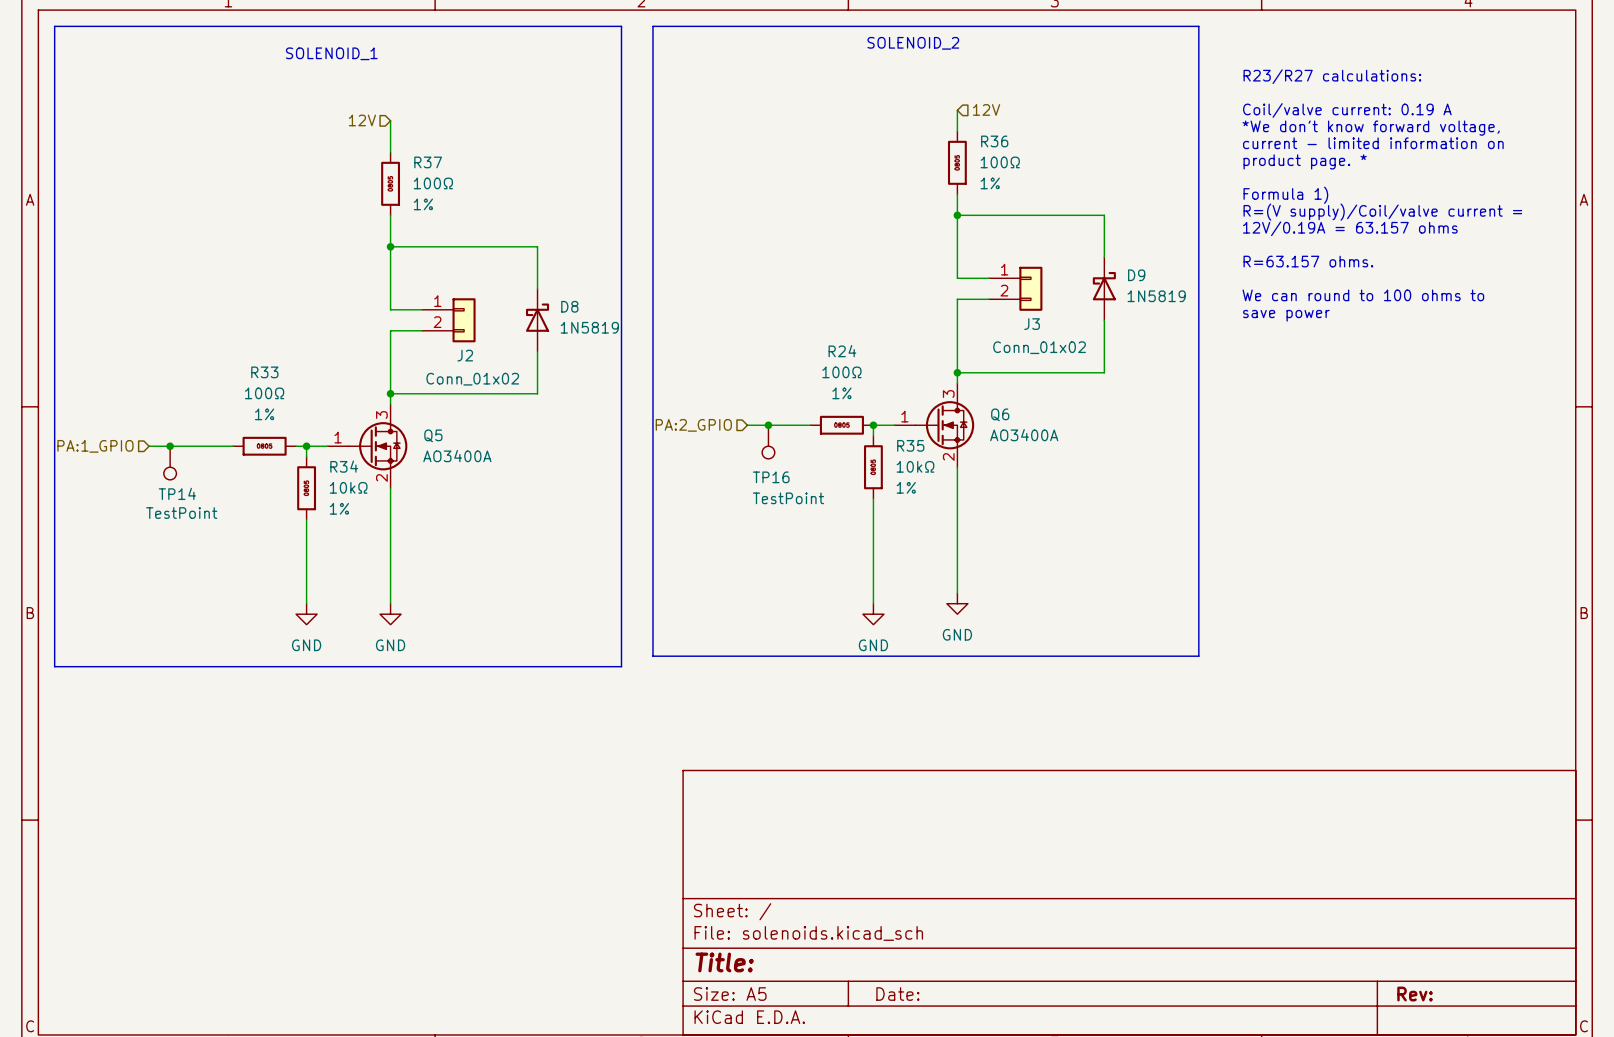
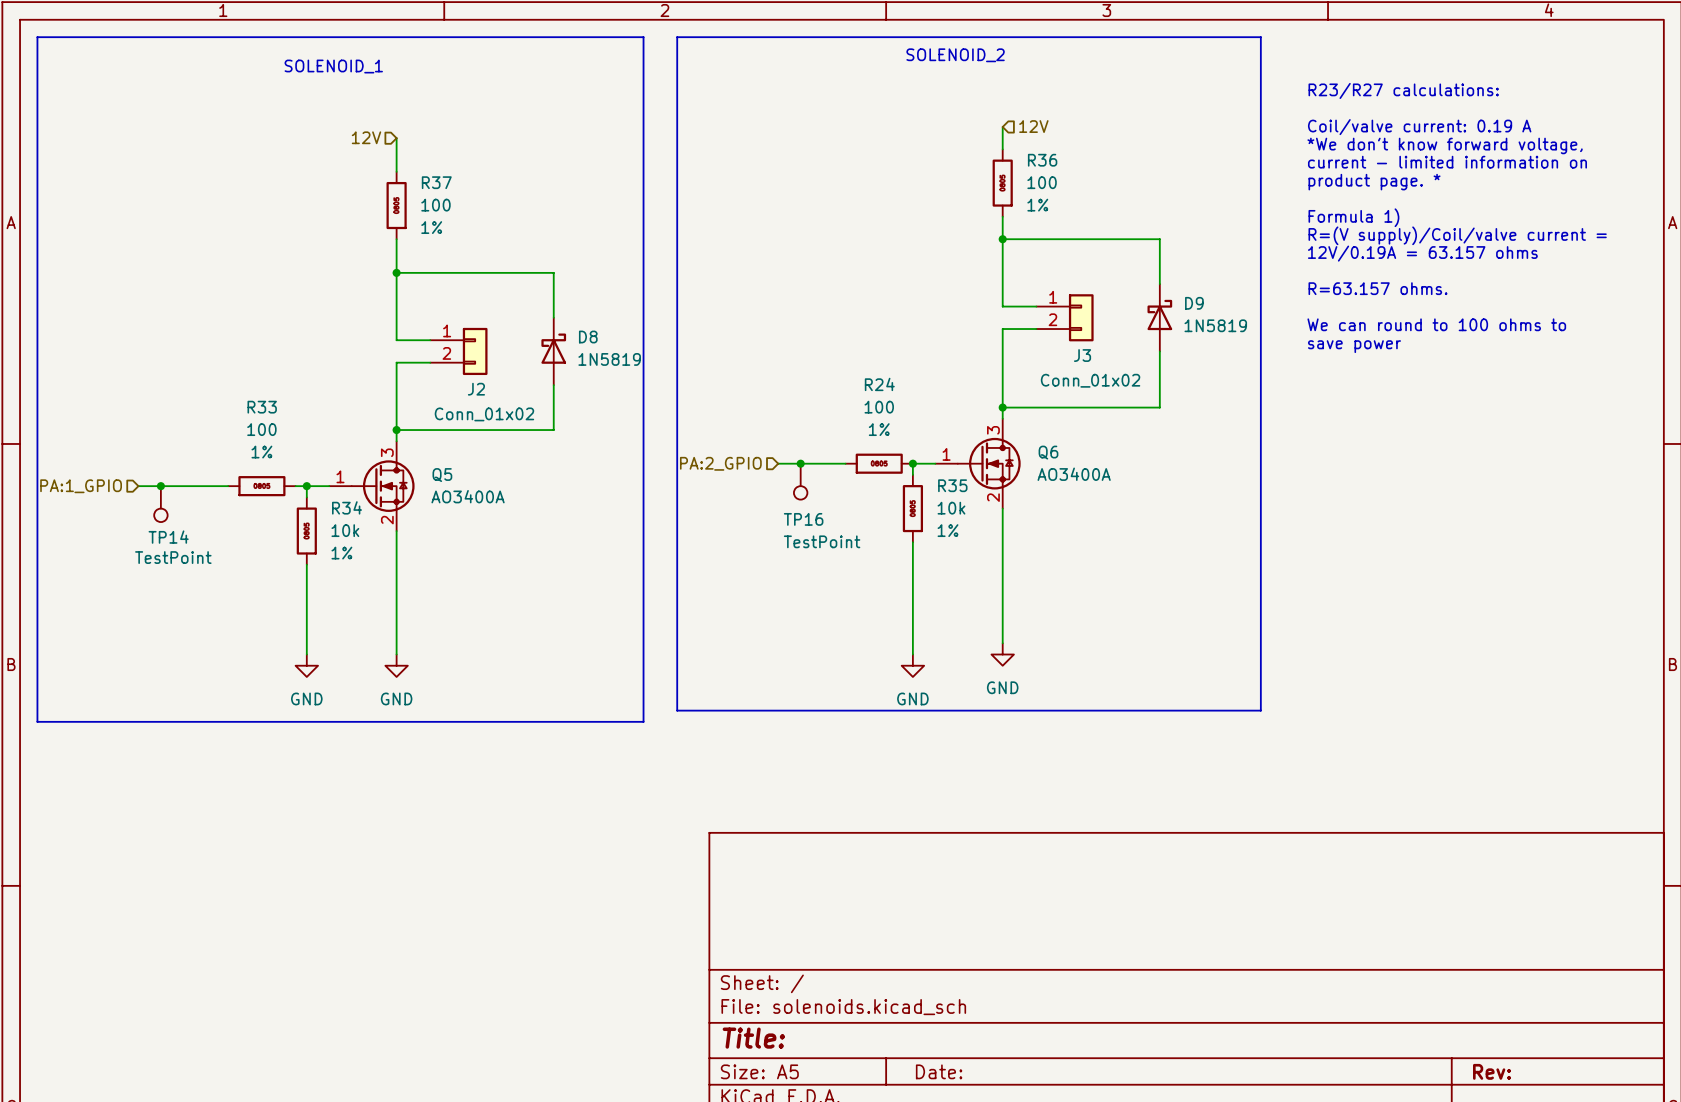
R36 value: 100Ω (1000, 162) -> 100 (1042, 182)
R37 value: 100Ω (433, 183) -> 100 (435, 205)
R24 value: 100Ω (841, 372) -> 100 (879, 407)
R33 value: 100Ω (264, 393) -> 100 (261, 429)
R35 value: 10kΩ (915, 466) -> 10k (951, 508)
R34 value: 10kΩ (348, 487) -> 10k (345, 530)

